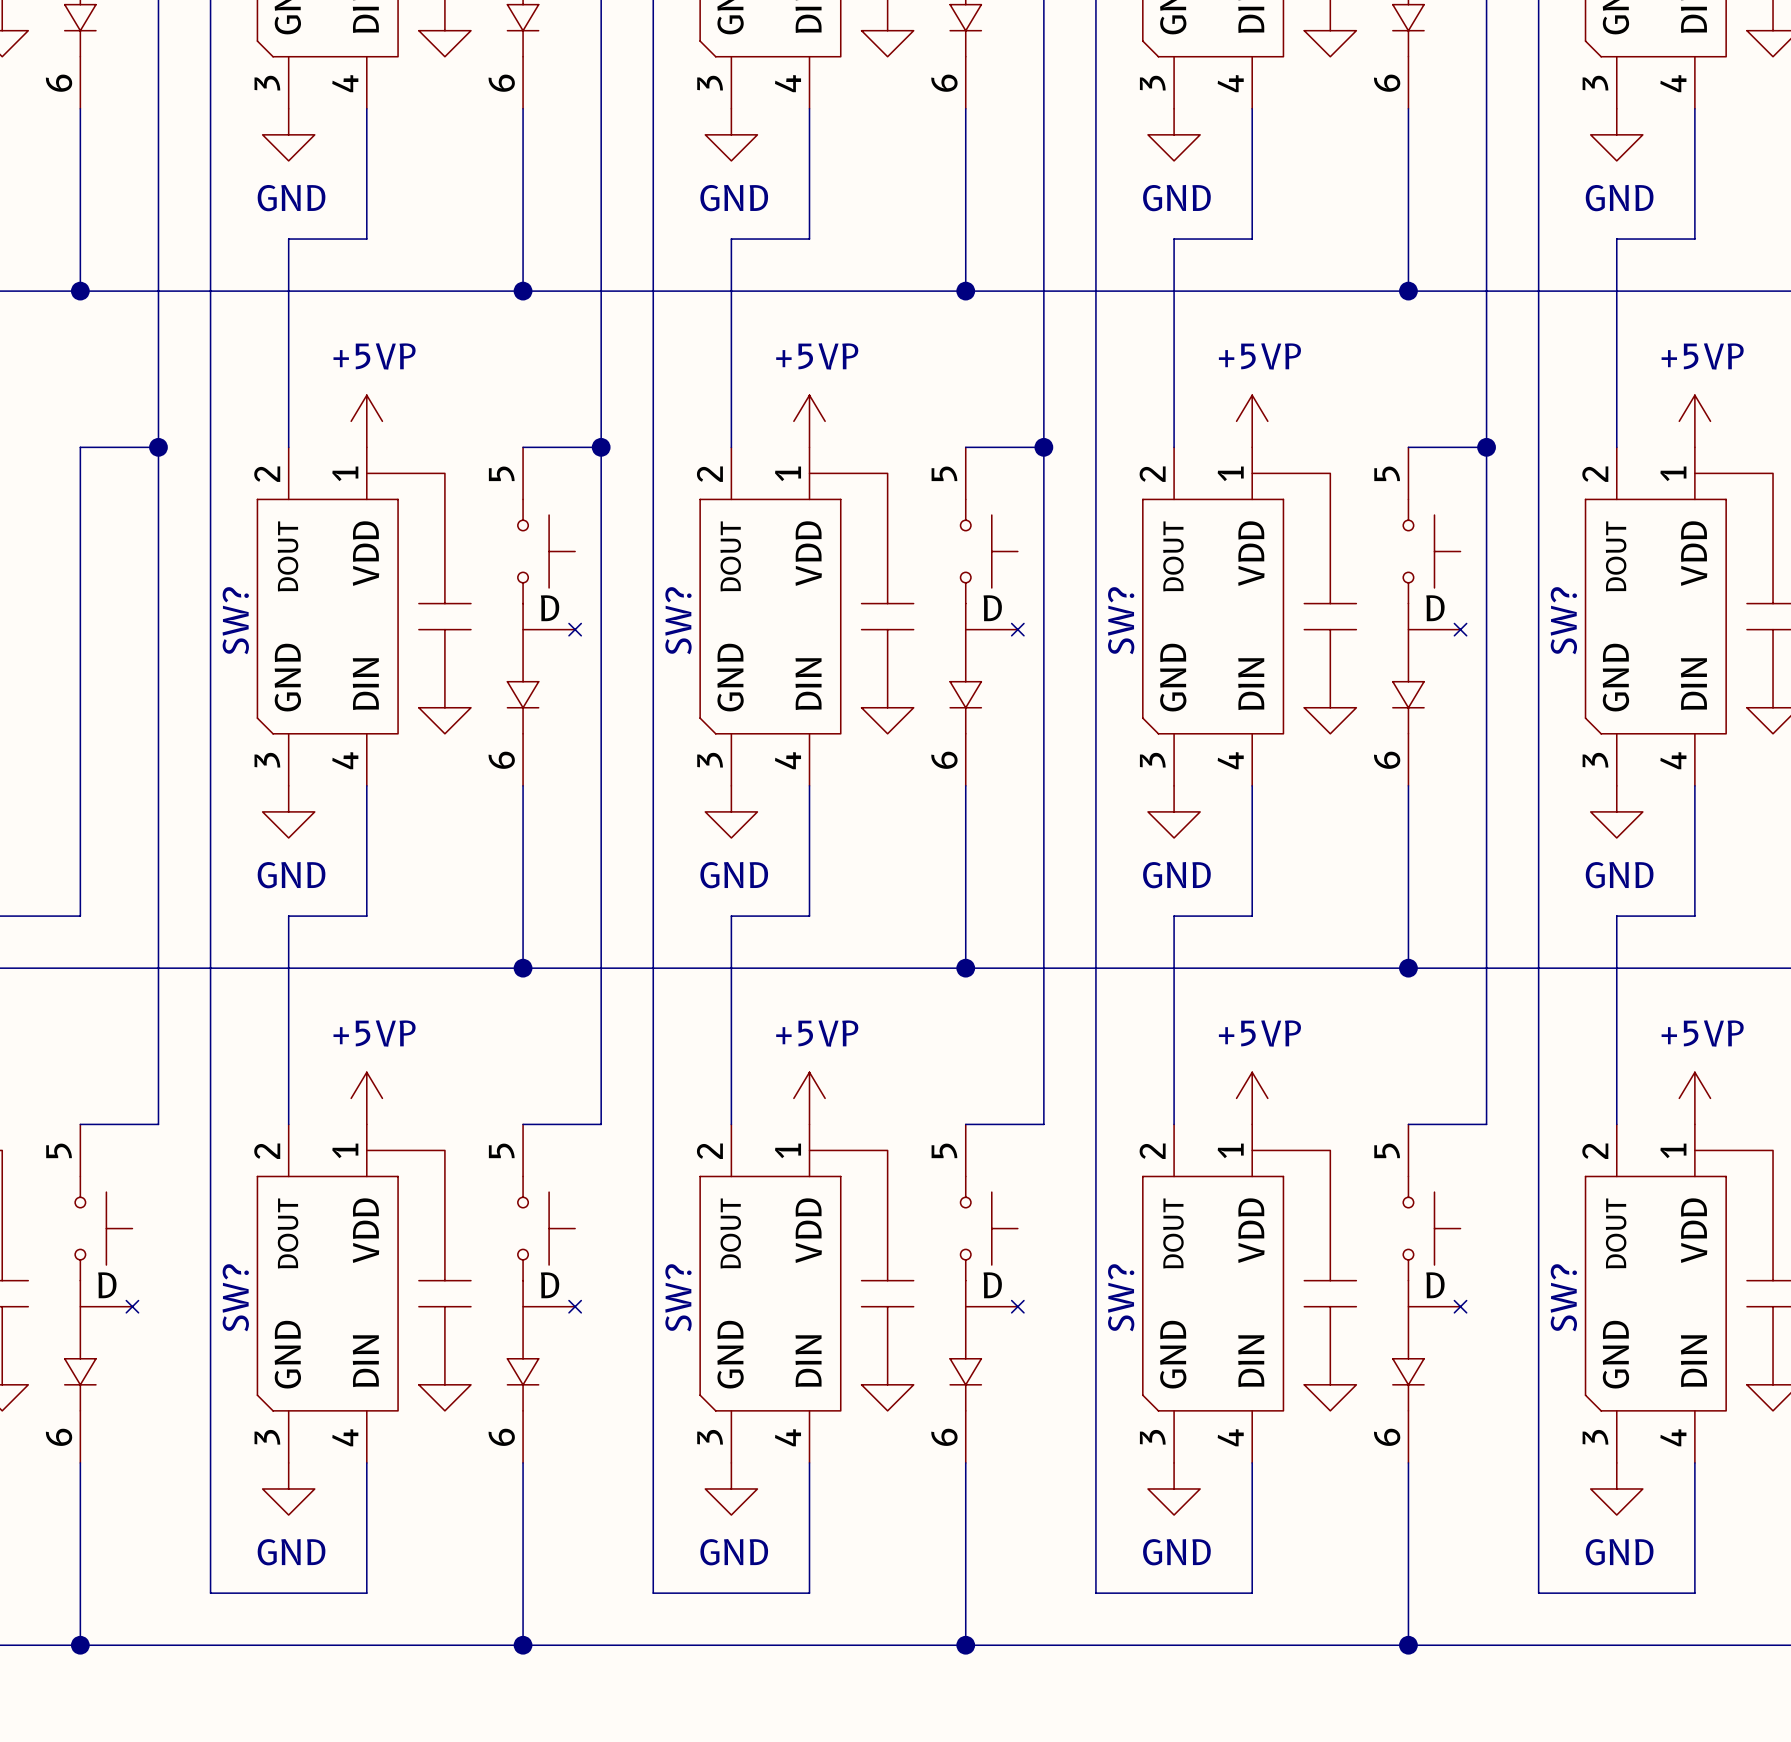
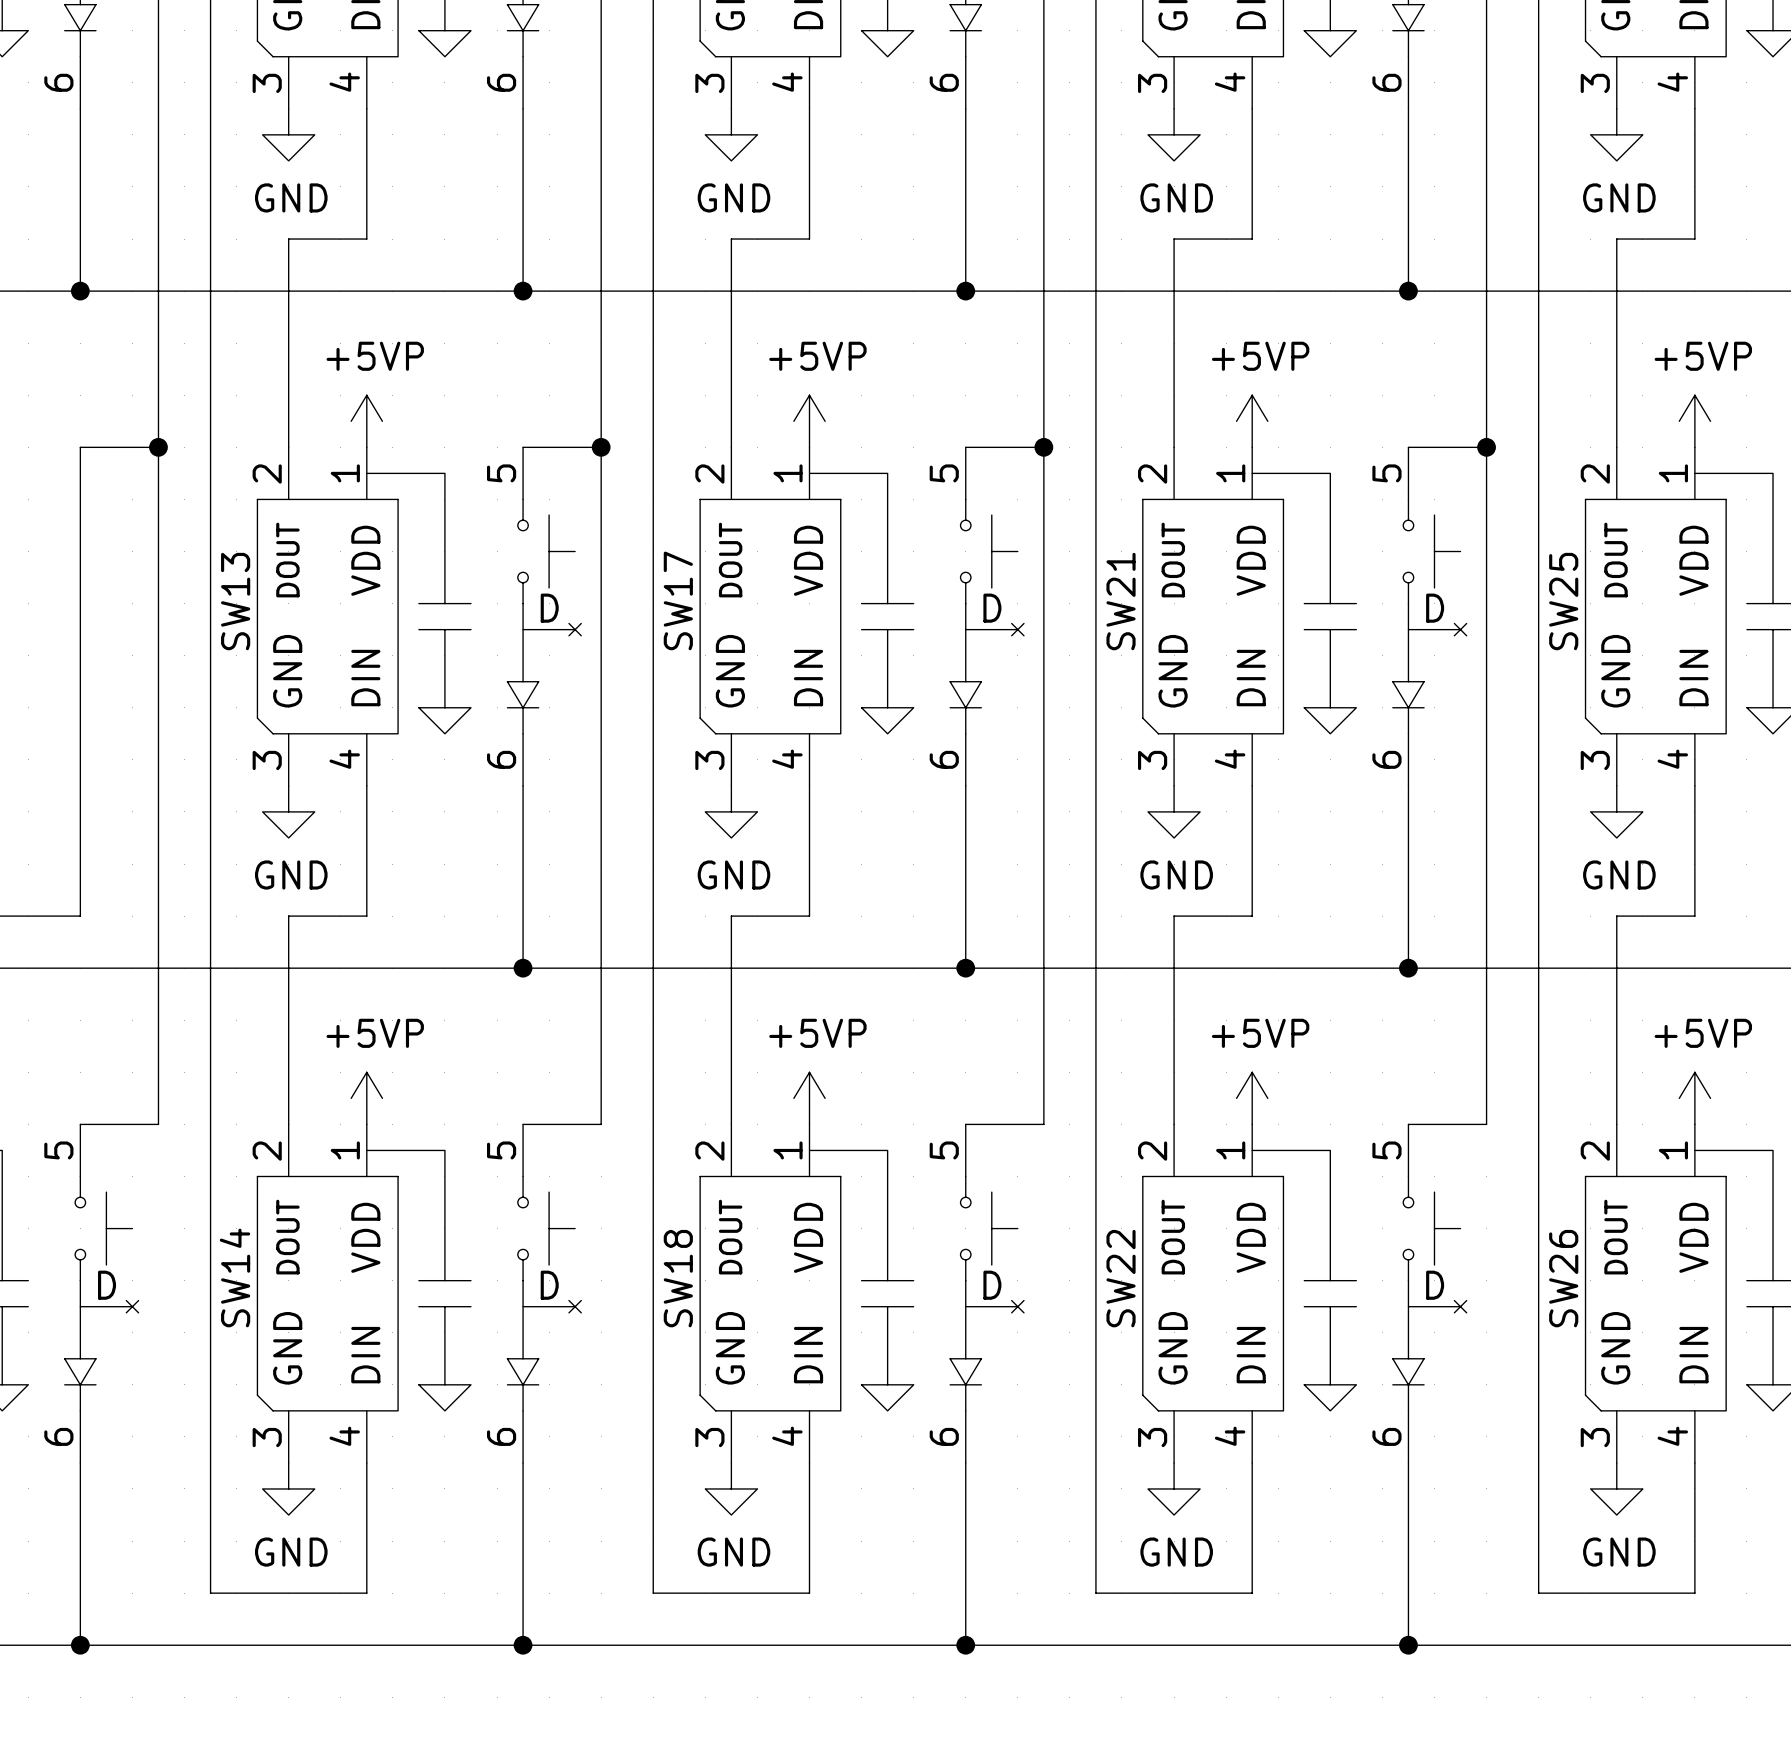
SW? name: SW? (235, 620) -> SW13 (235, 601)
SW? name: SW? (678, 620) -> SW17 (678, 600)
SW? name: SW? (1121, 620) -> SW21 (1121, 601)
SW? name: SW? (1563, 620) -> SW25 (1563, 601)
SW? name: SW? (235, 1297) -> SW14 (235, 1277)
SW? name: SW? (678, 1297) -> SW18 (678, 1278)
SW? name: SW? (1121, 1297) -> SW22 (1121, 1278)
SW? name: SW? (1563, 1297) -> SW26 (1563, 1278)

